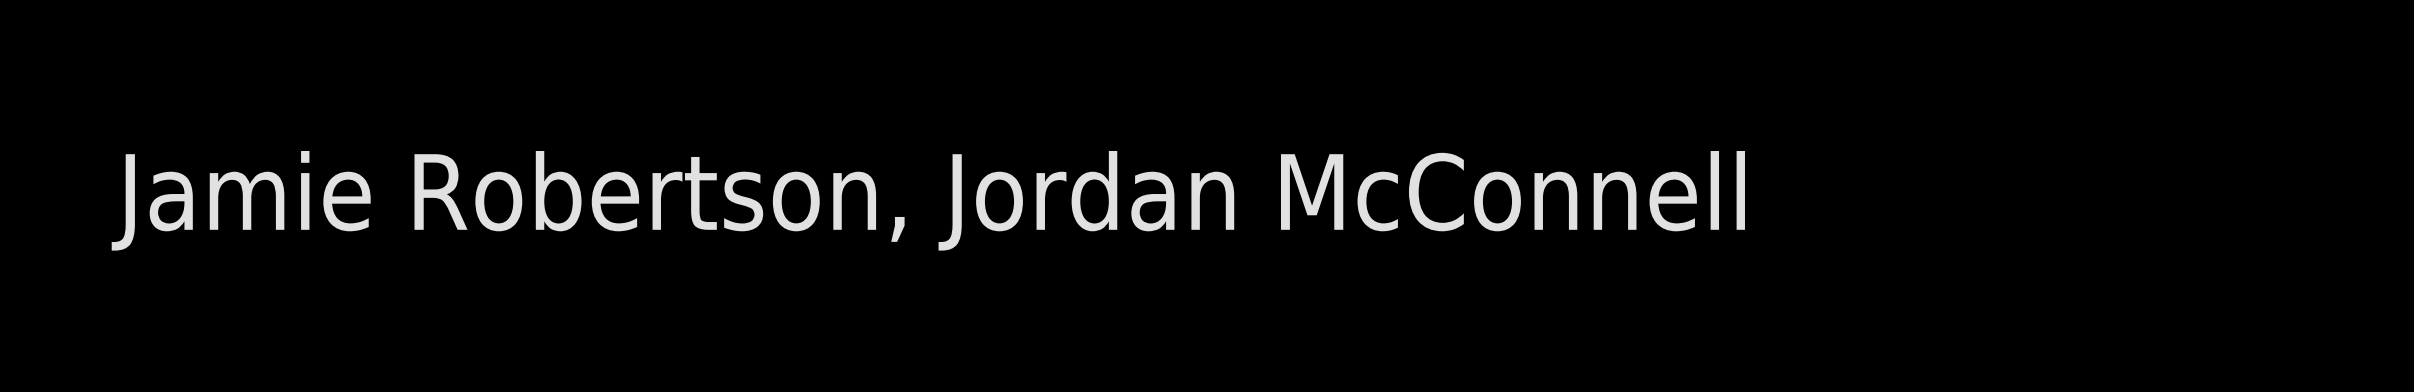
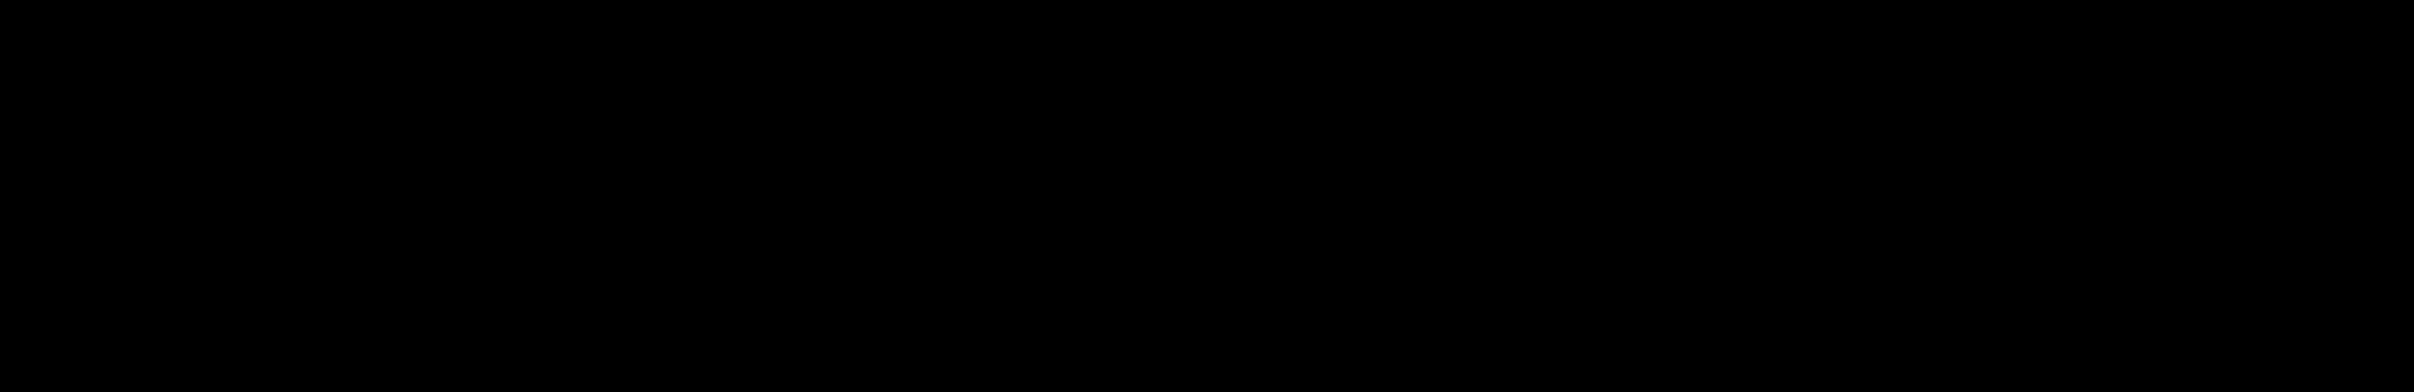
text: Jamie Robertson, Jordan McConnell (928, 200) -> none

